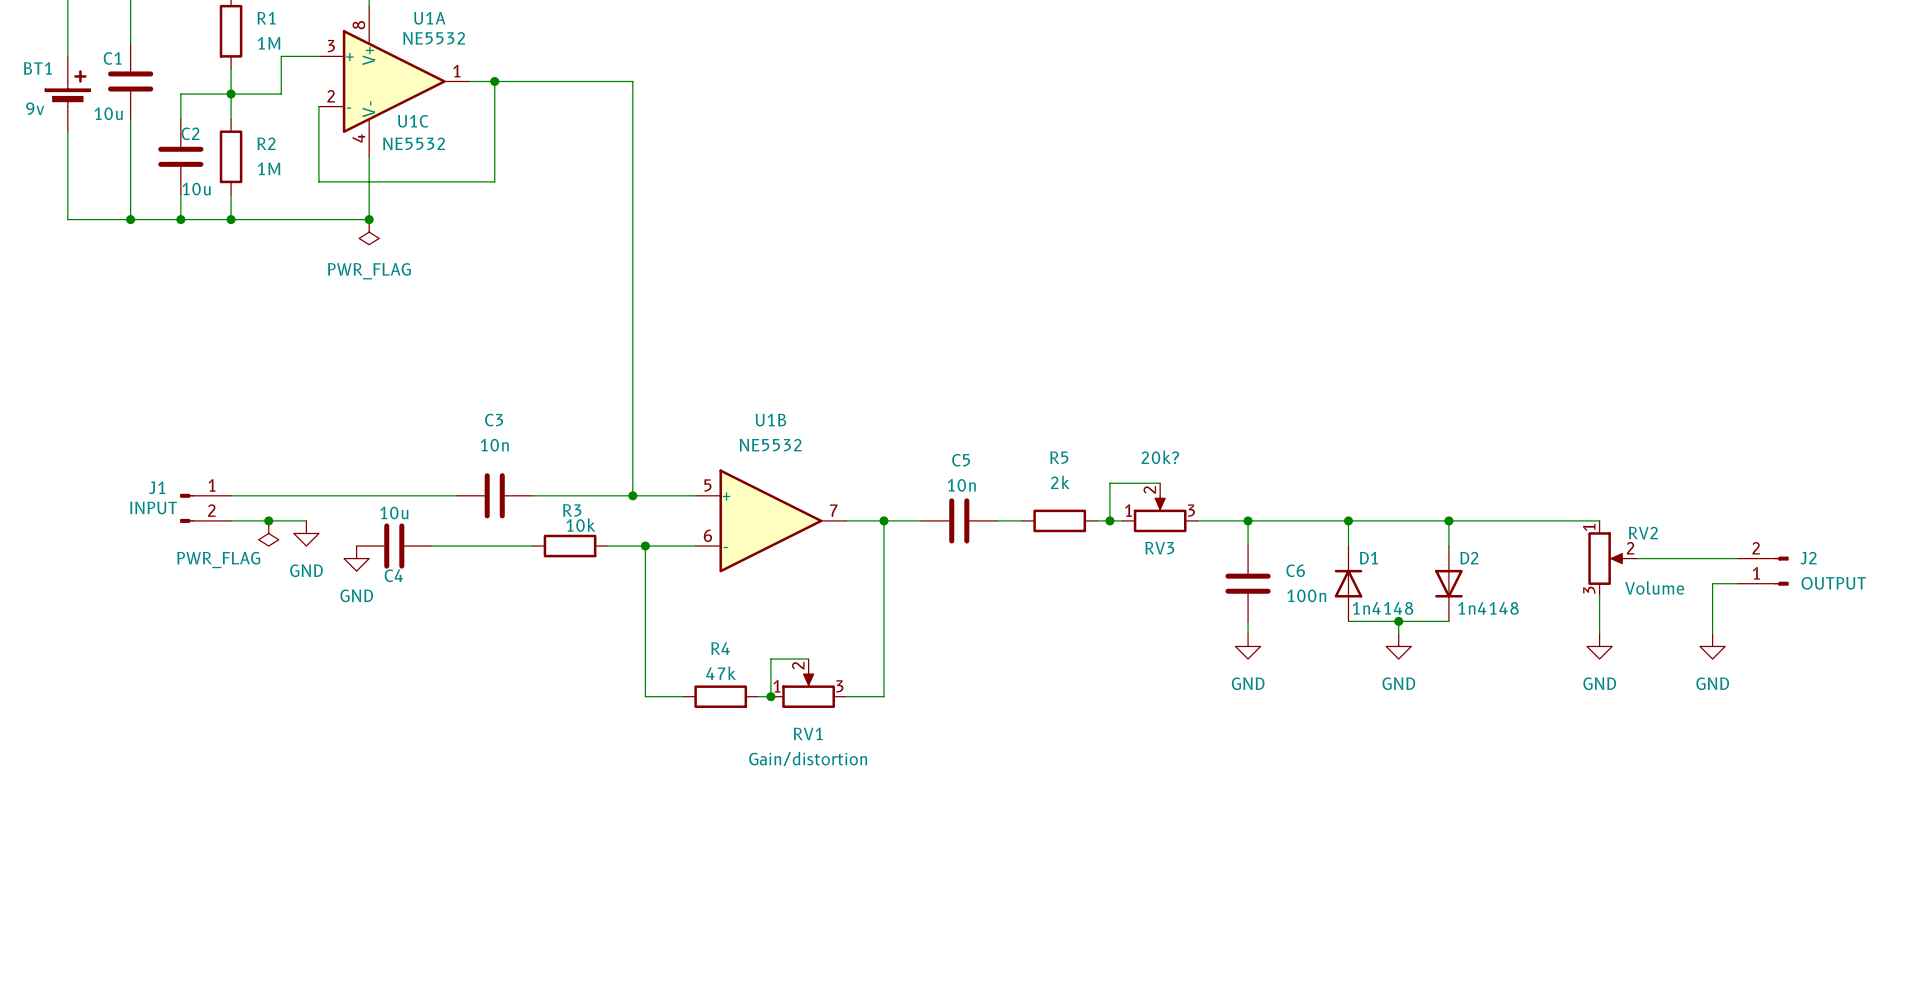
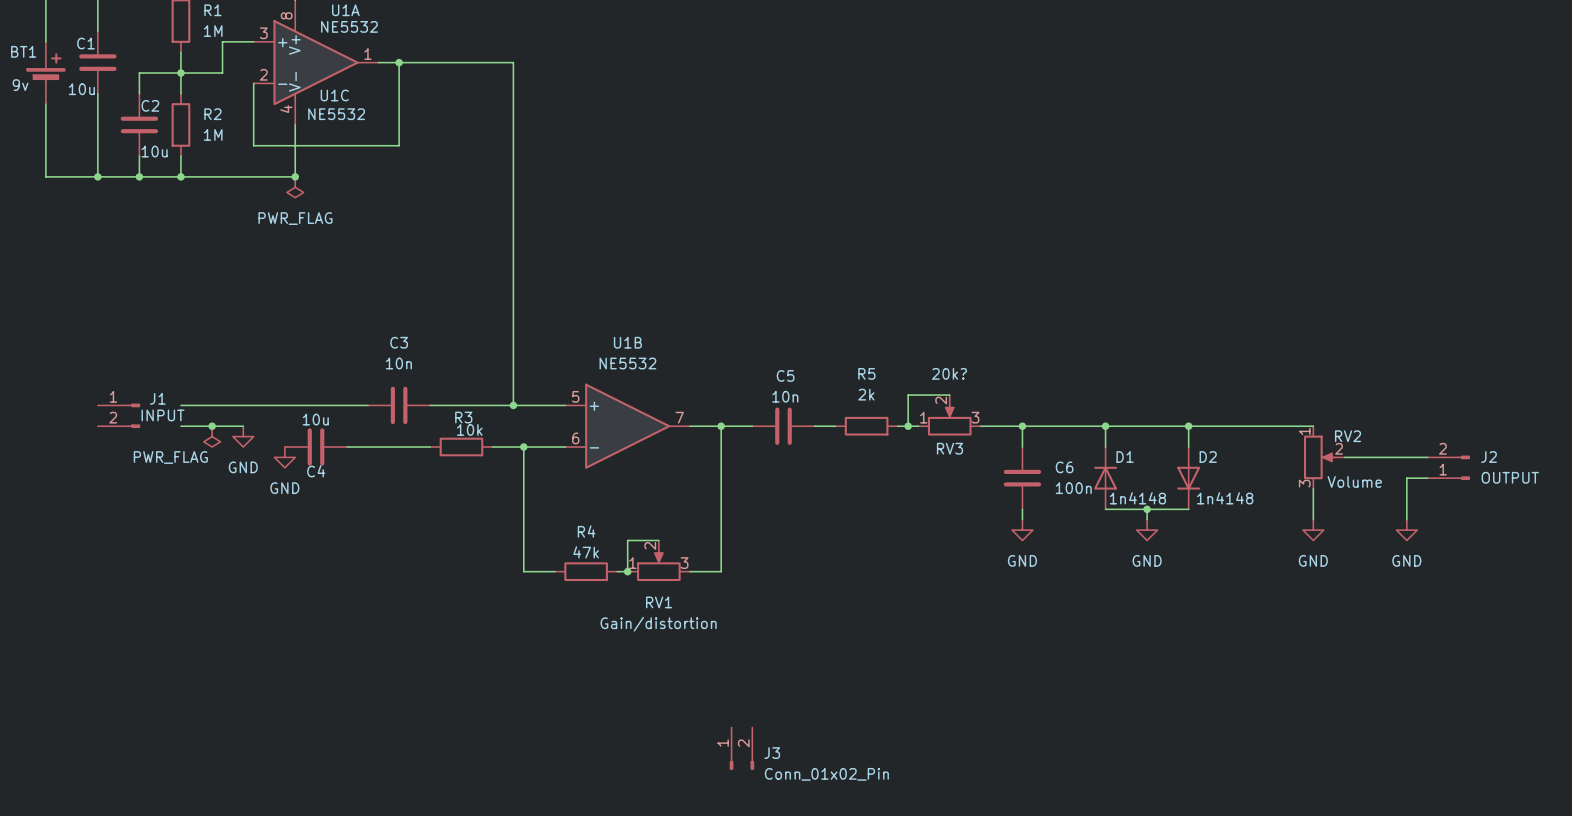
J1 flip: as is (187, 508) -> left-right (134, 415)
J1 position: (205, 508) -> (118, 415)
J3: none -> Conn_01x02_Pin (741, 748)

